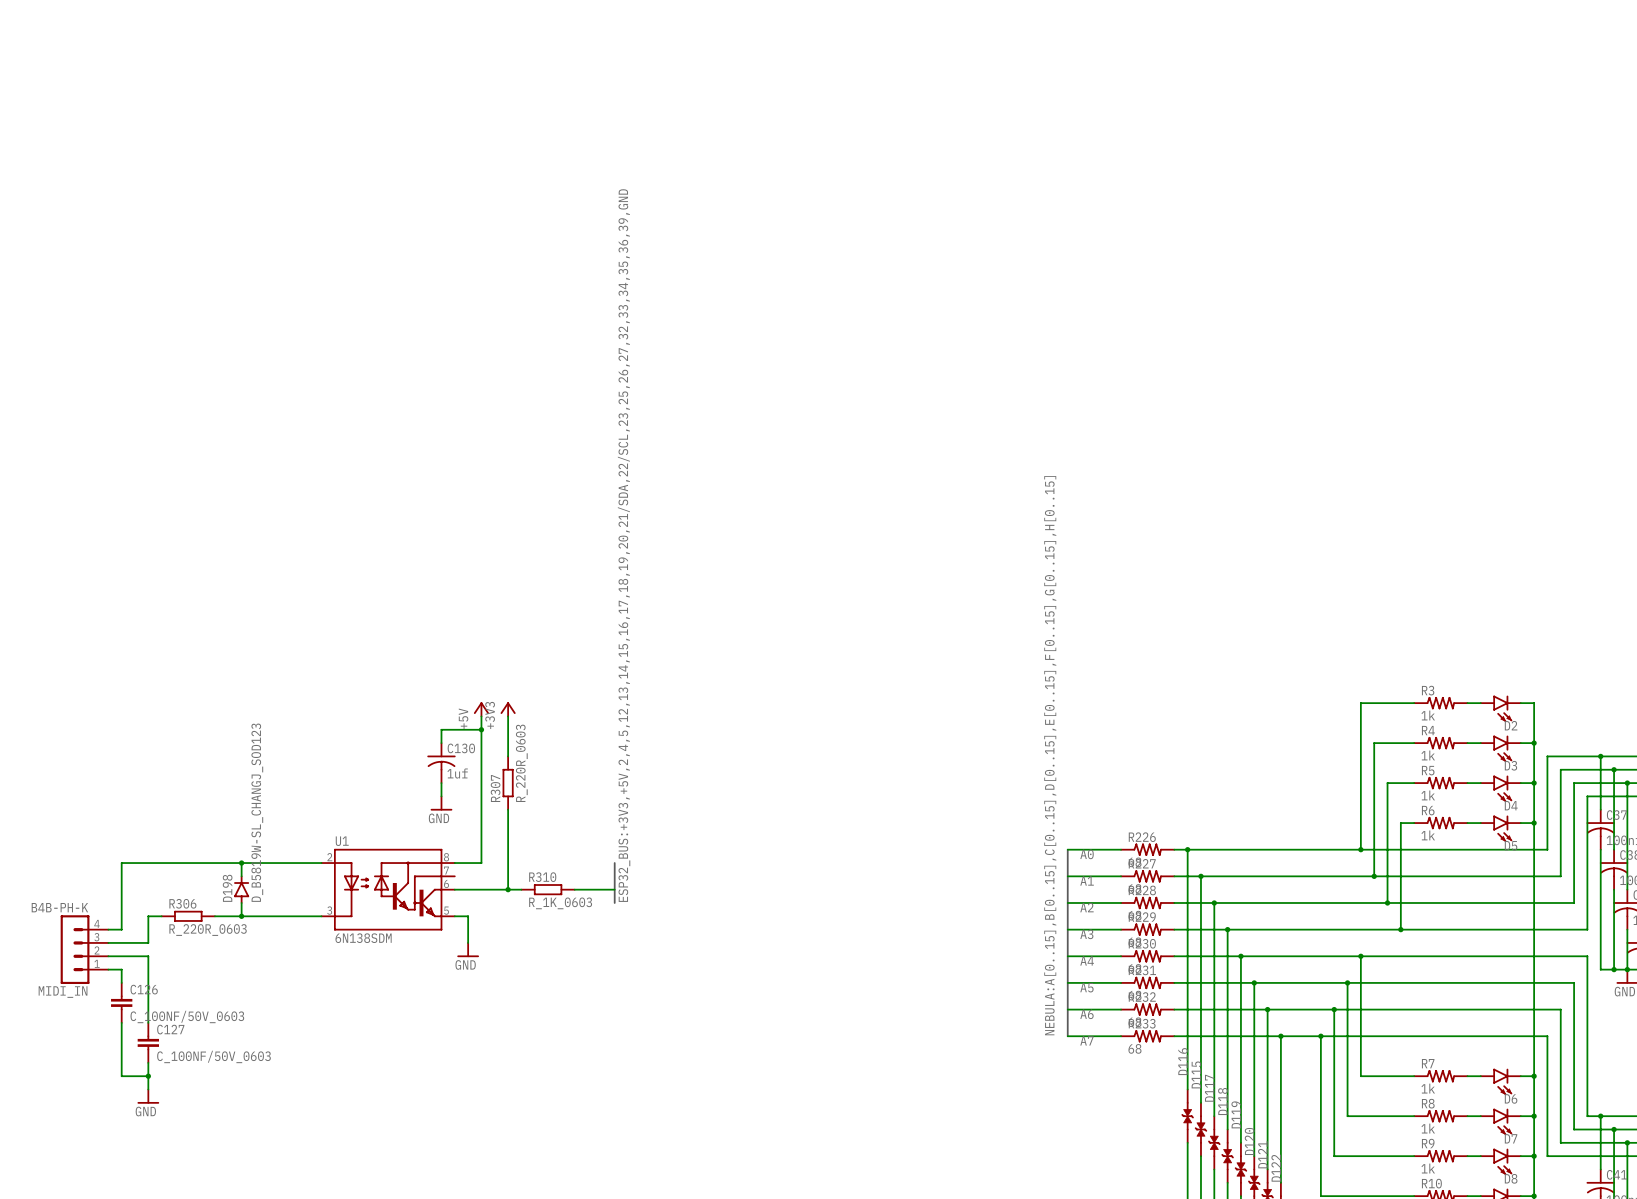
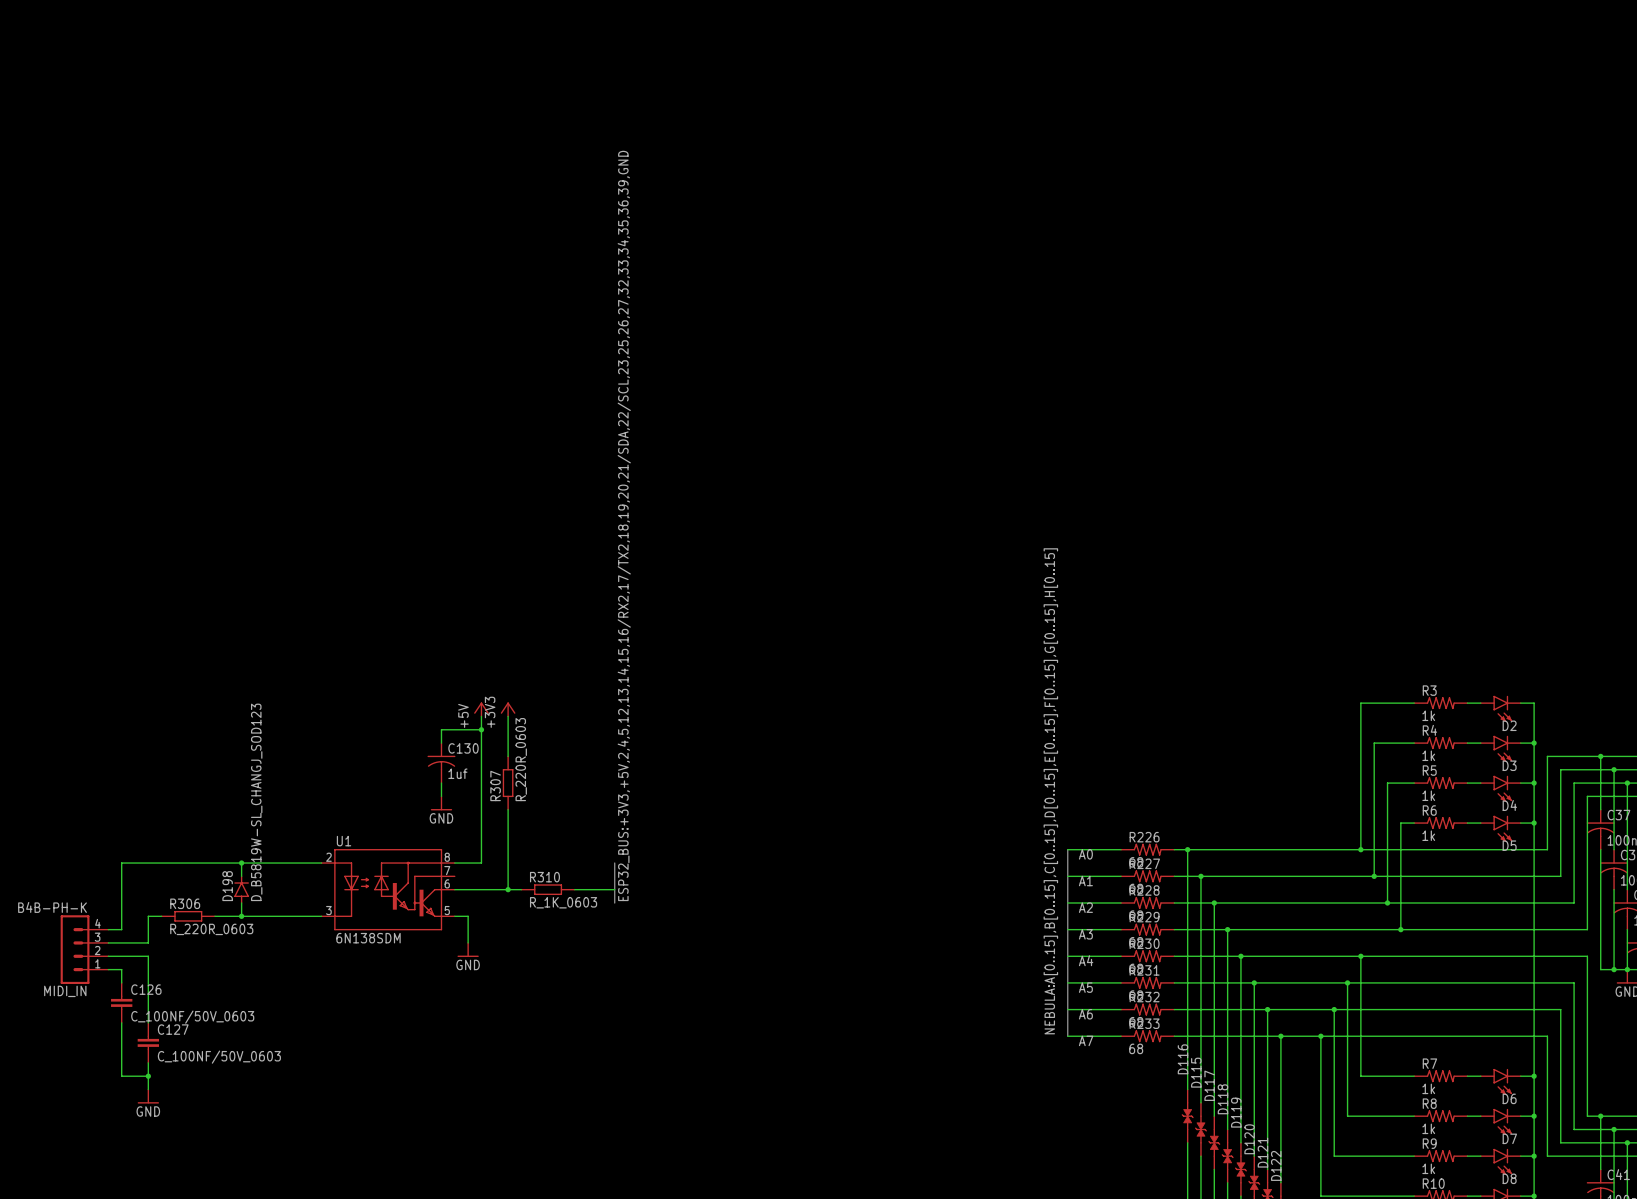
label: ESP32_BUS:+3V3,+5V,2,4,5,12,13,14,15,16,17,18,19,20,21/SDA,22/SCL,23,25,26,27,32,33,34,35,36,39,GND (624, 545) -> ESP32_BUS:+3V3,+5V,2,4,5,12,13,14,15,16/RX2,17/TX2,18,19,20,21/SDA,22/SCL,23,25,26,27,32,33,34,35,36,39,GND (624, 525)

